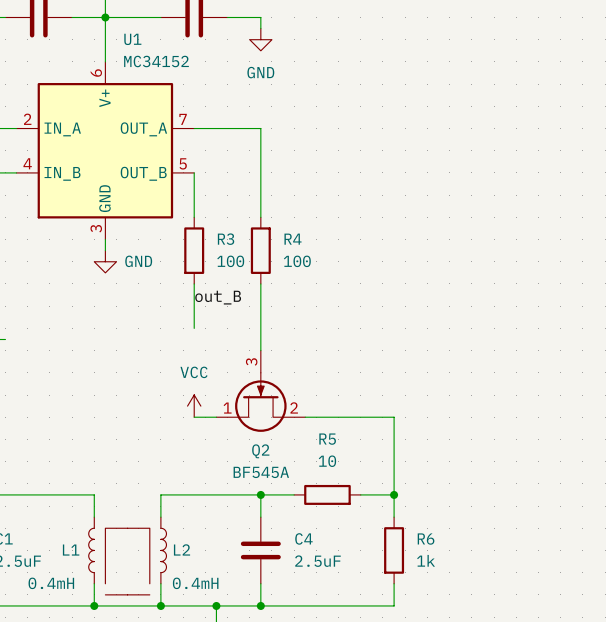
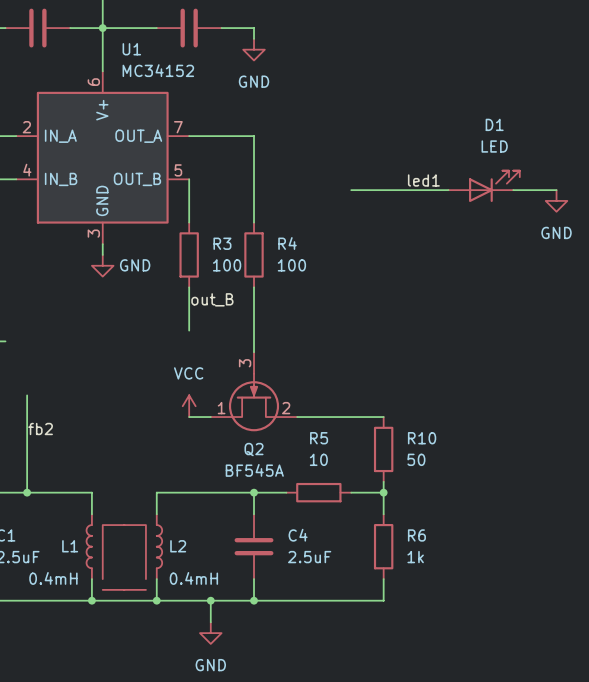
label: none -> led1 (423, 180)
D1: none -> LED (484, 186)
wire: none -> (351, 190) (448, 190)
wire: none -> (513, 190) (556, 190)
power symbol: none -> GND (556, 200)
wire: none -> (27, 395) (27, 492)
wire: (394, 417) (394, 483) -> none
label: none -> fb2 (40, 428)
R10: none -> 50 (383, 449)
junction: none -> (27, 492)

